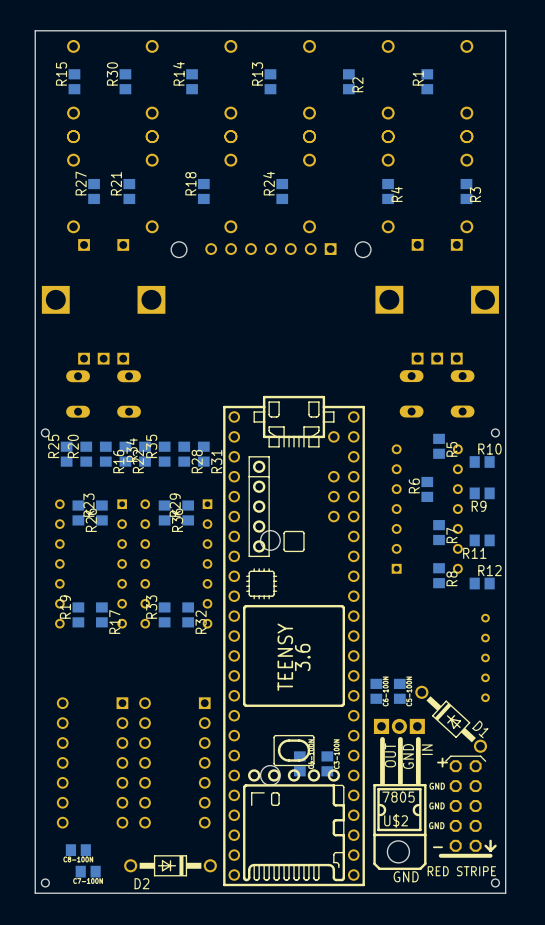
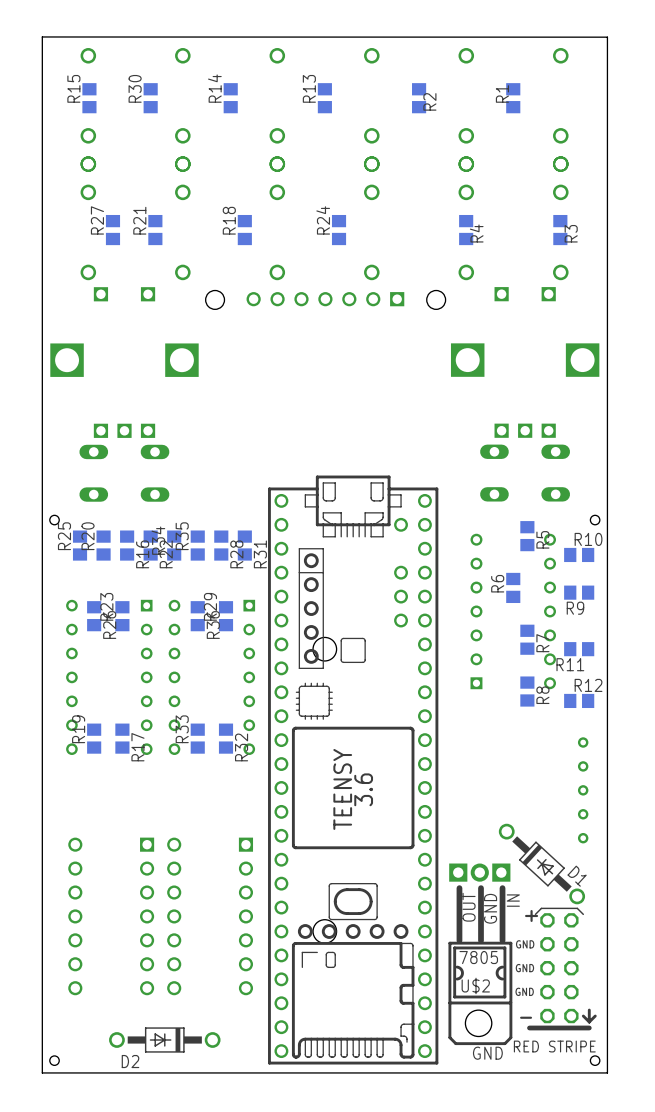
part: (376, 691) -> none
part: (399, 691) -> none
part: (299, 763) -> none
part: (327, 763) -> none
part: (78, 850) -> none
D2 position: (170, 865) -> (164, 1040)
part: (88, 871) -> none

